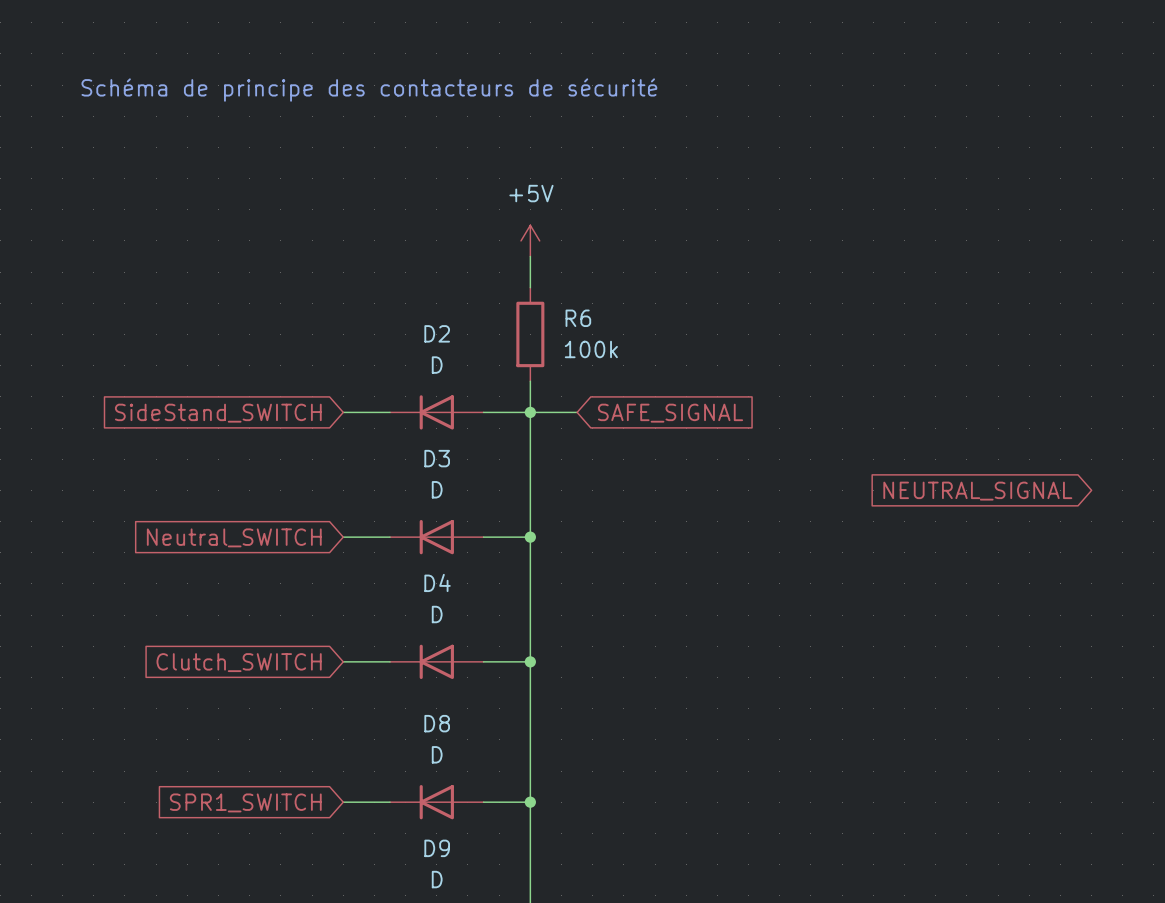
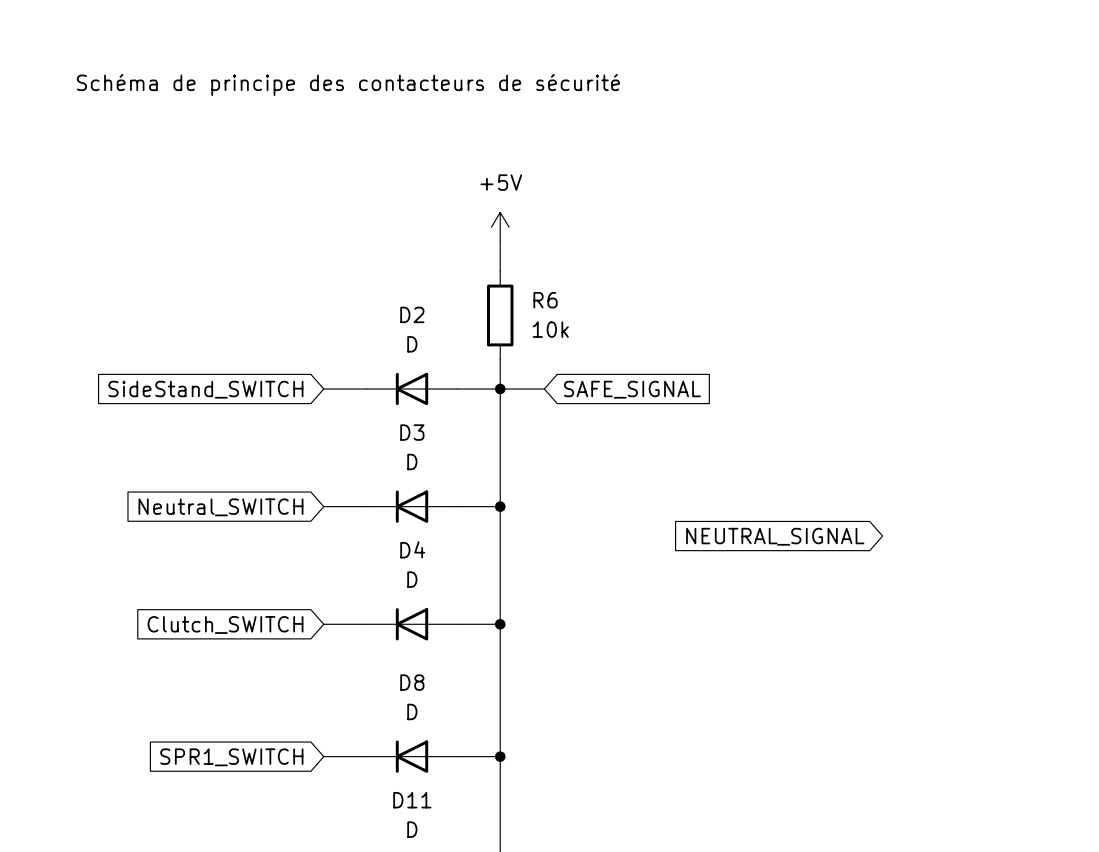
R6 value: 100k (591, 349) -> 10k (550, 329)
global label position: NEUTRAL_SIGNAL (977, 491) -> NEUTRAL_SIGNAL (775, 536)
D9 name: D9 (437, 848) -> D11 (412, 800)

